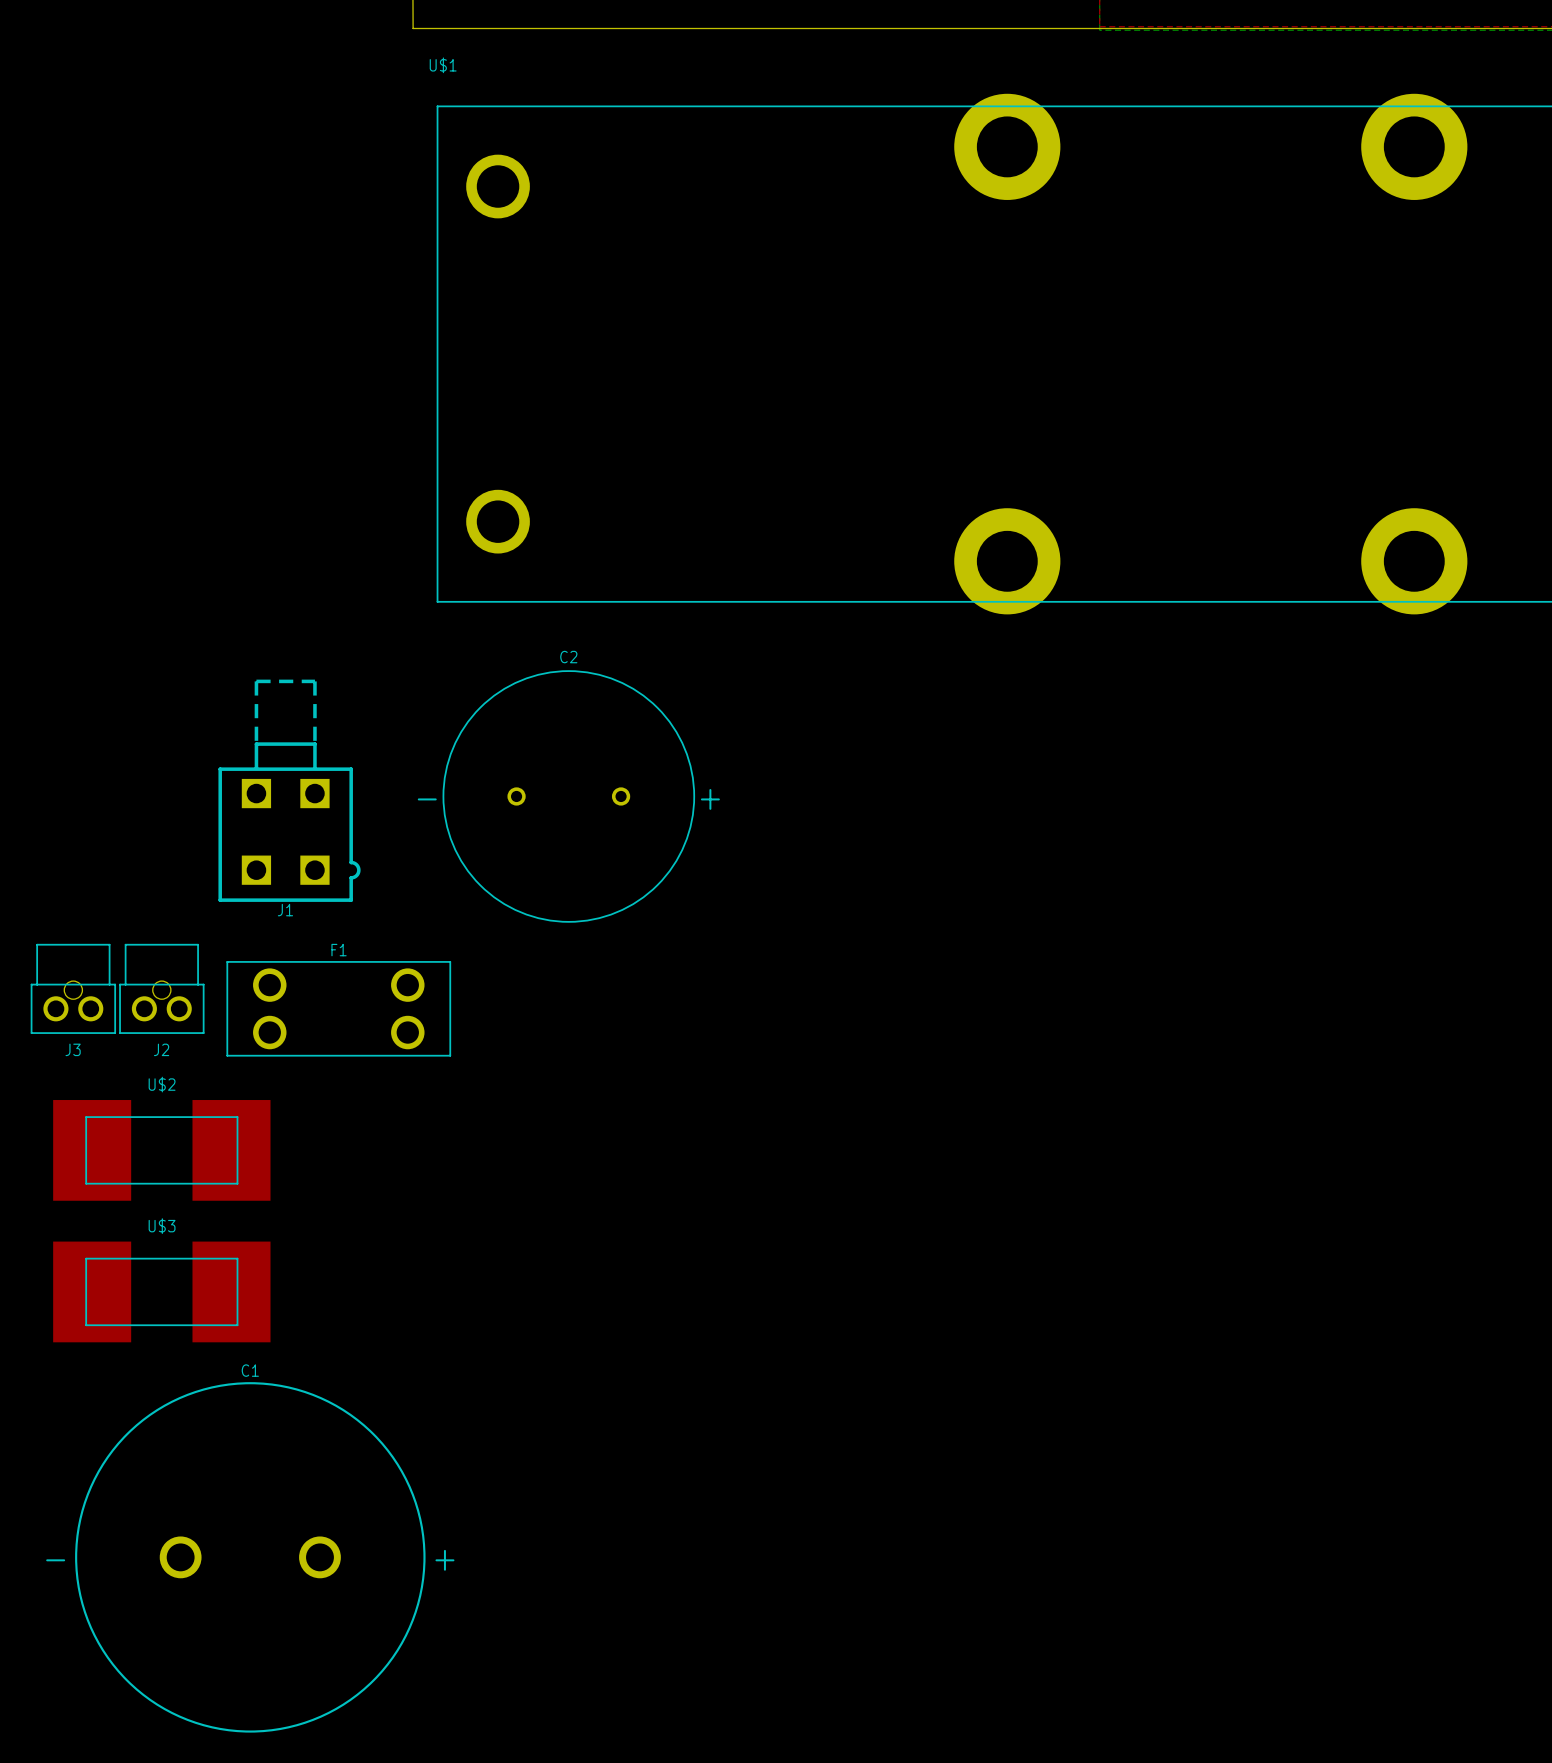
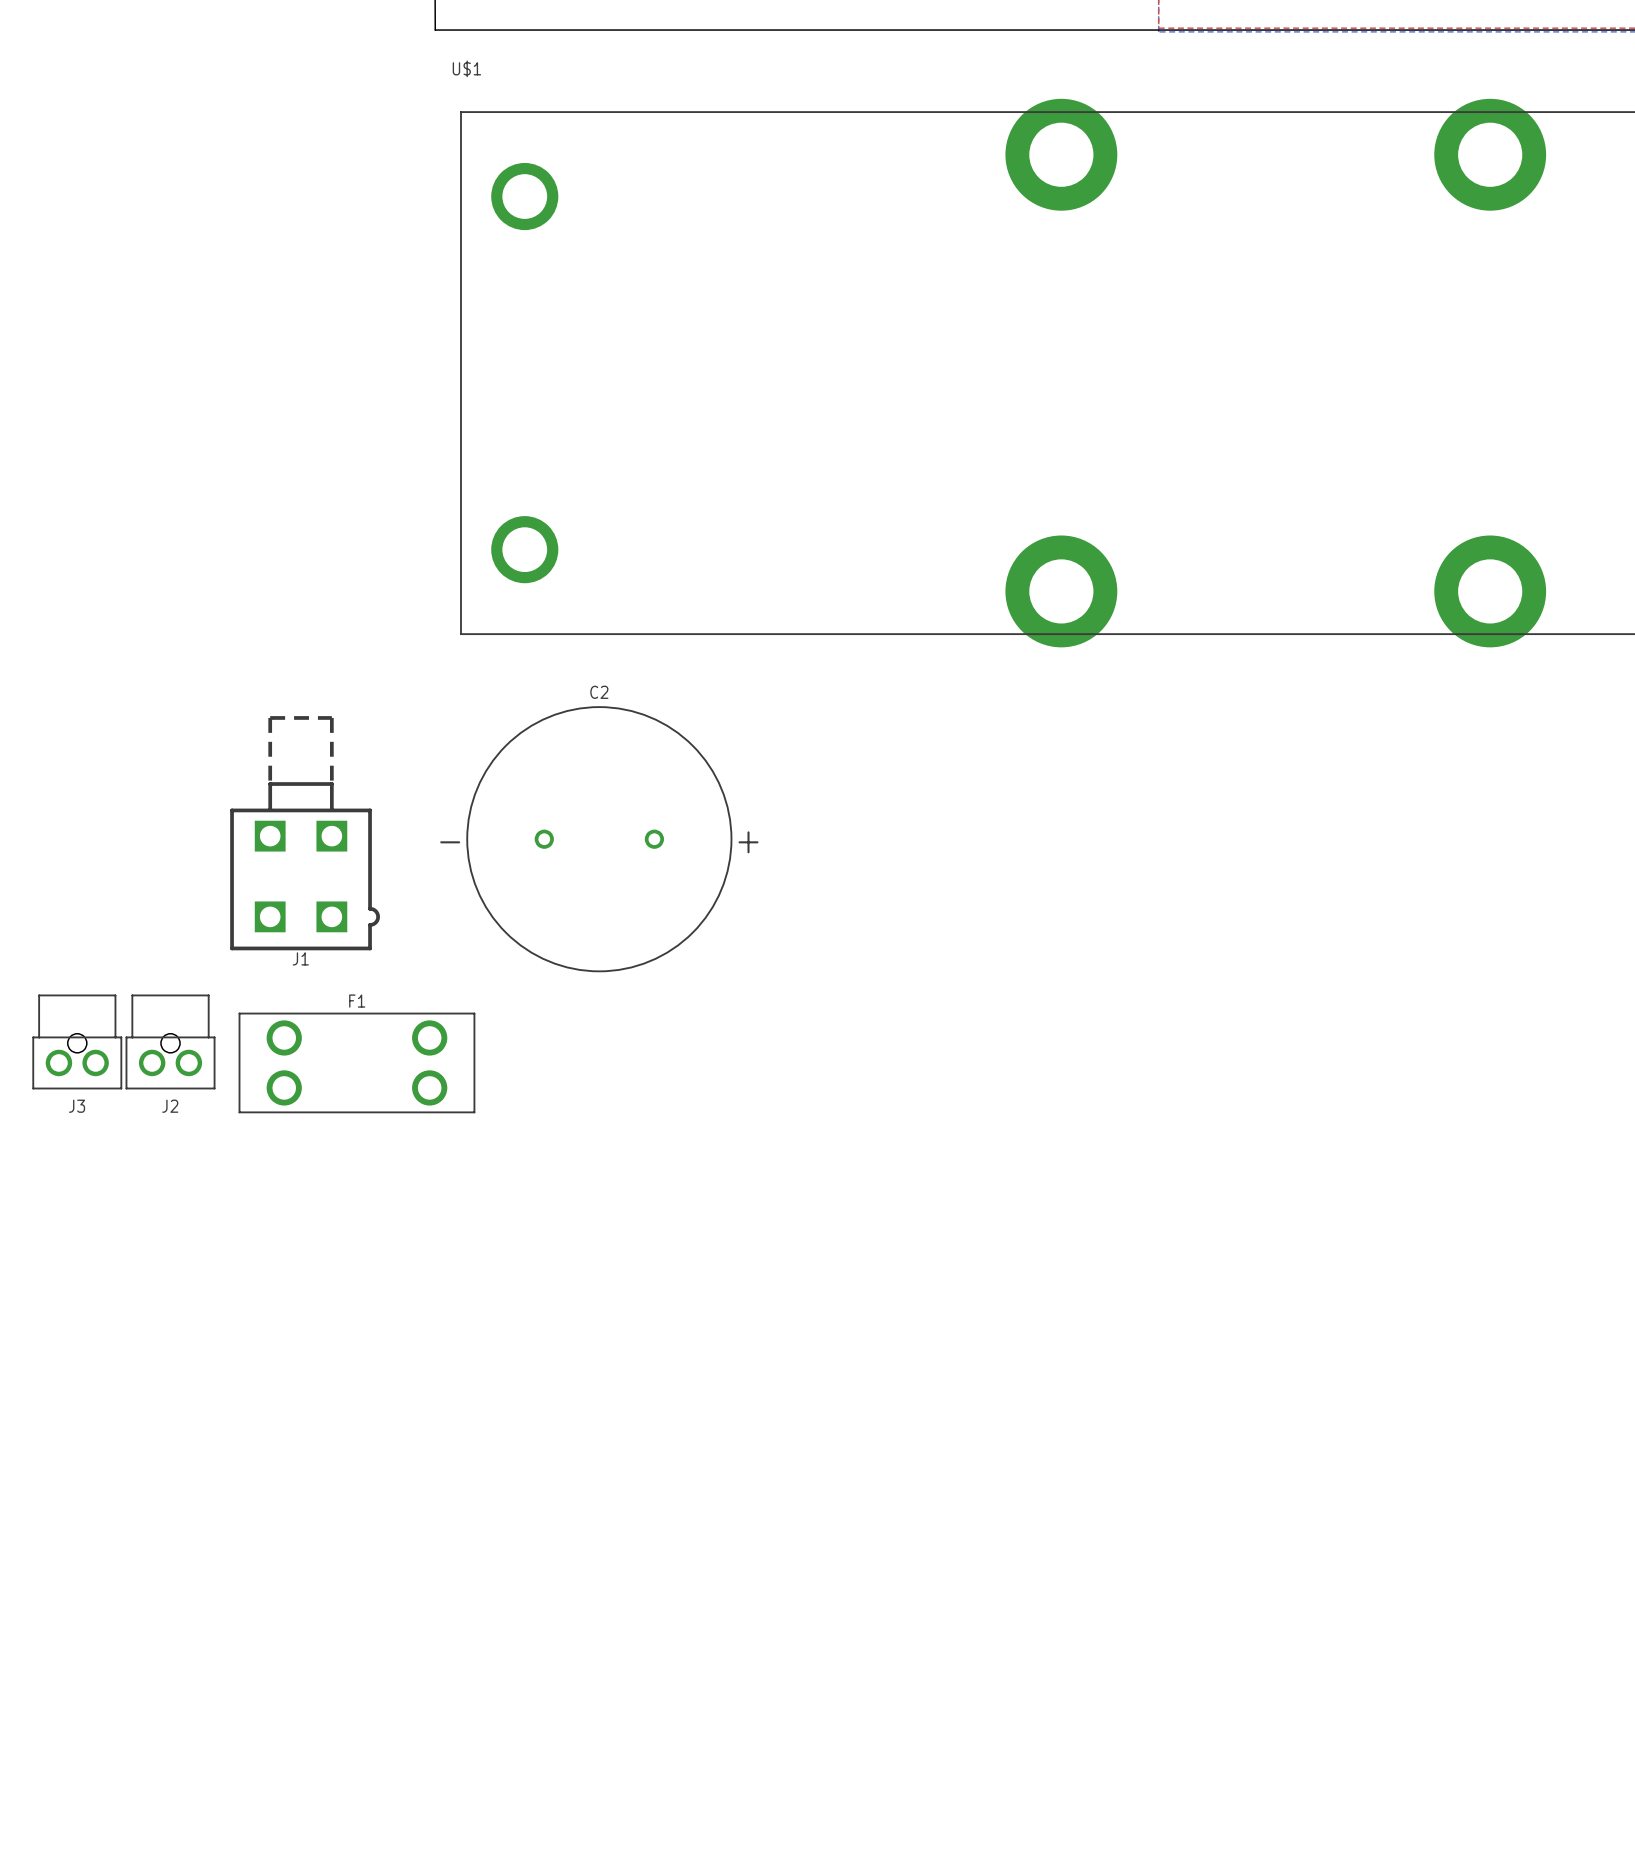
U$2: (161, 1150) -> none
U$3: (161, 1291) -> none
C1: (250, 1557) -> none

